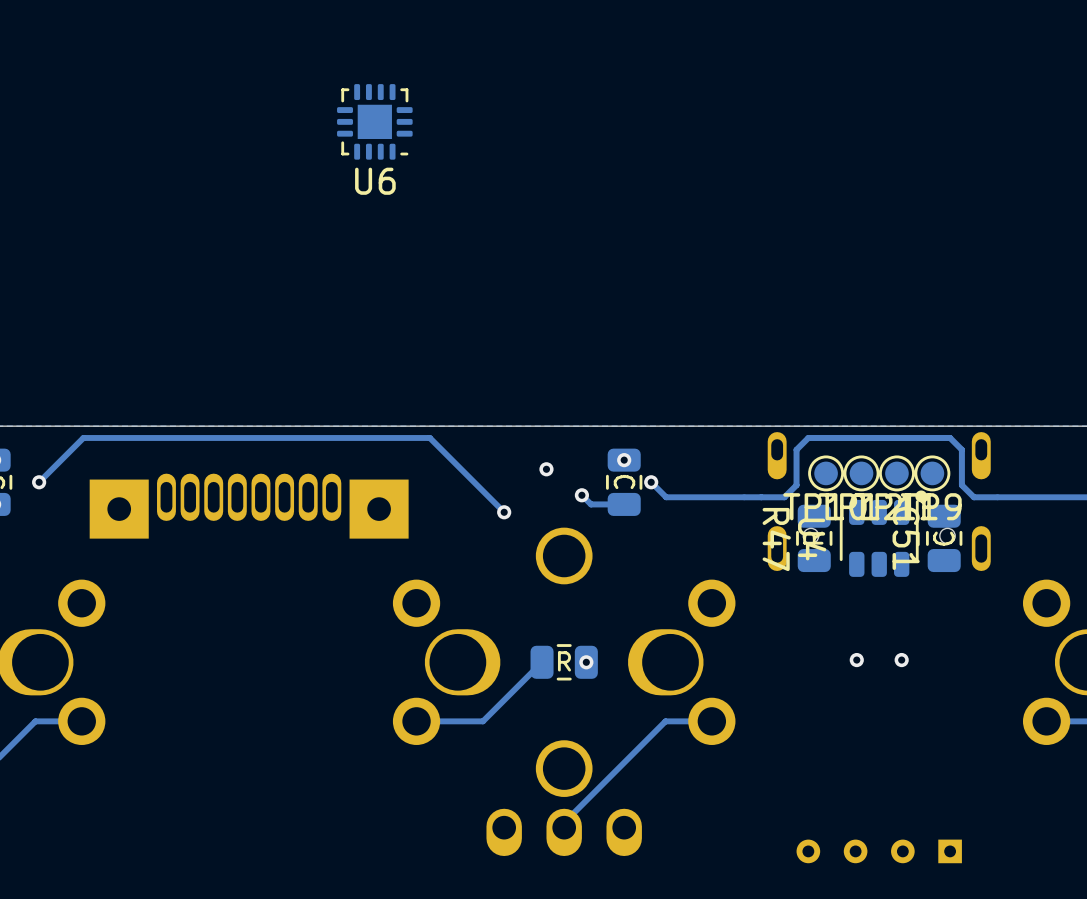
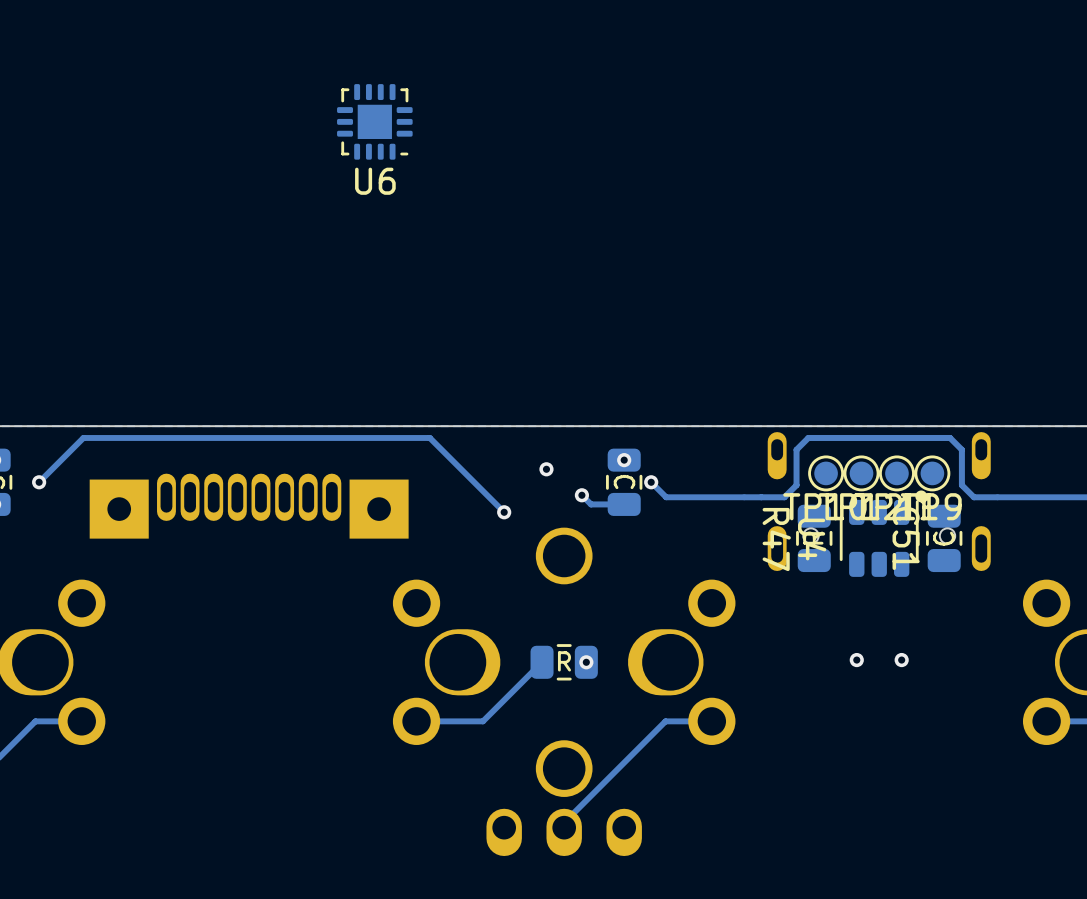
part: (808, 851) -> none
part: (855, 851) -> none
part: (902, 851) -> none
part: (950, 851) -> none

